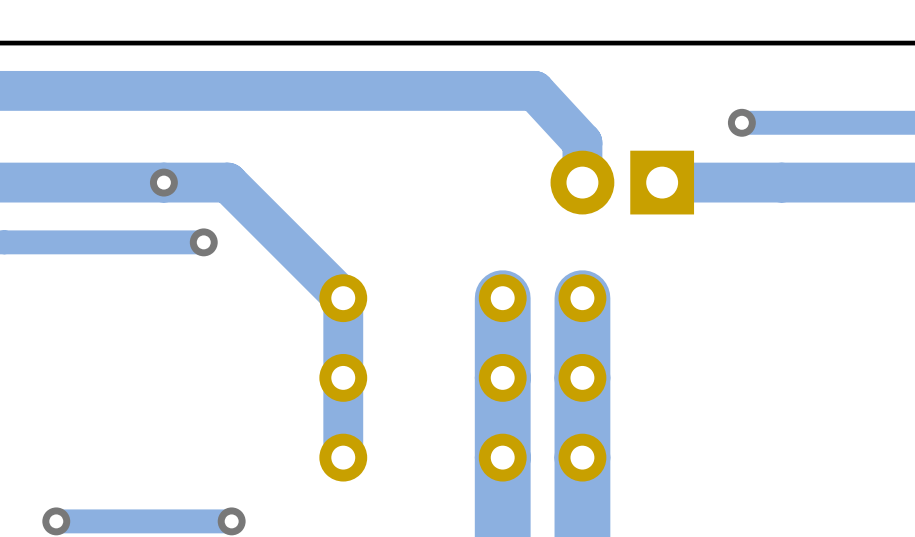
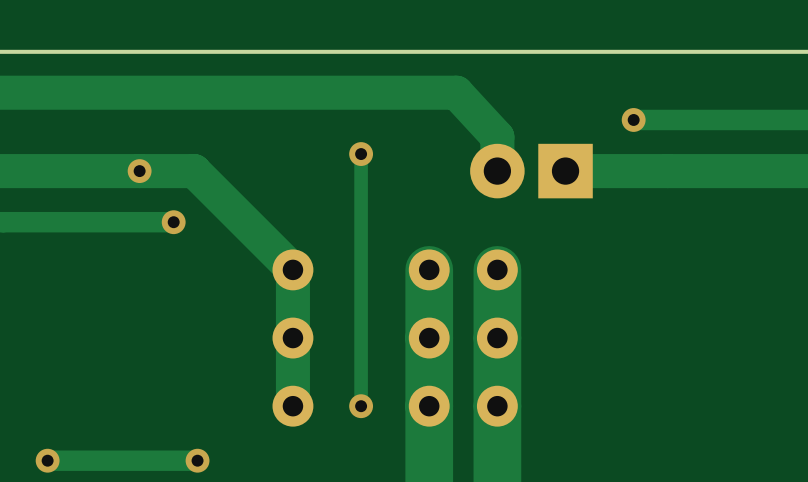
track: none -> (361, 154) (361, 406)
via: none -> (361, 154)
via: none -> (361, 406)

